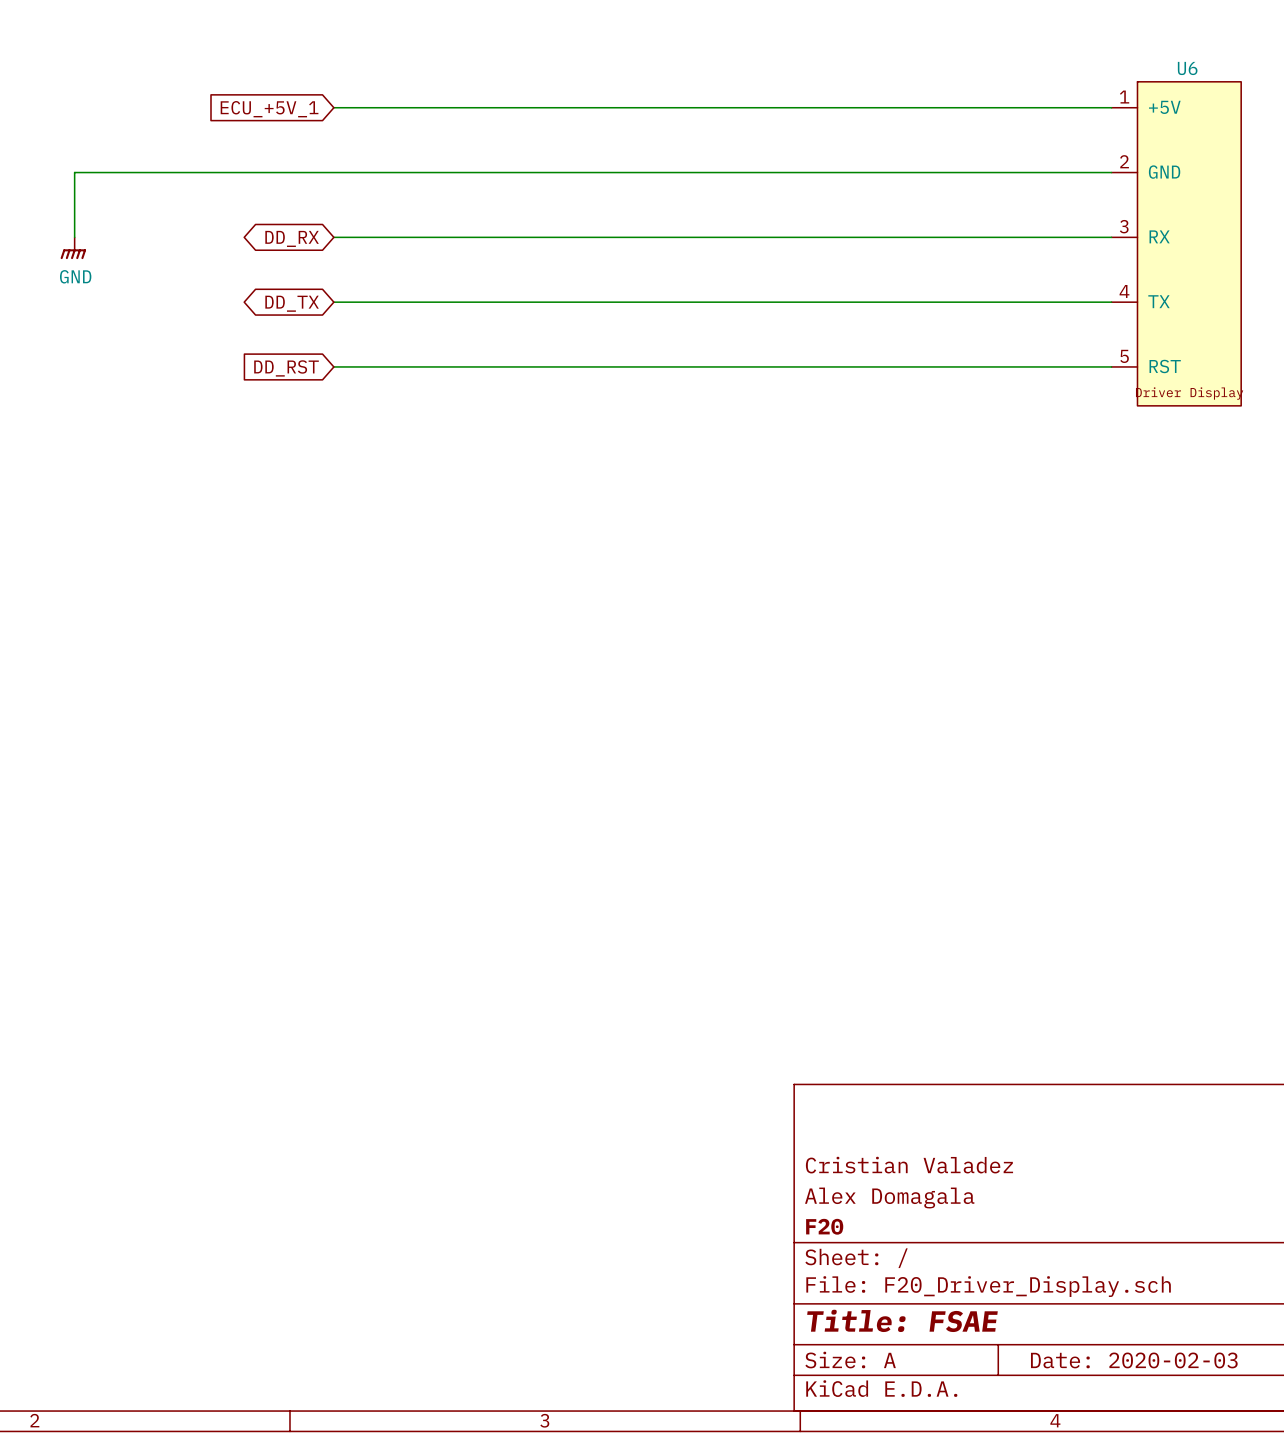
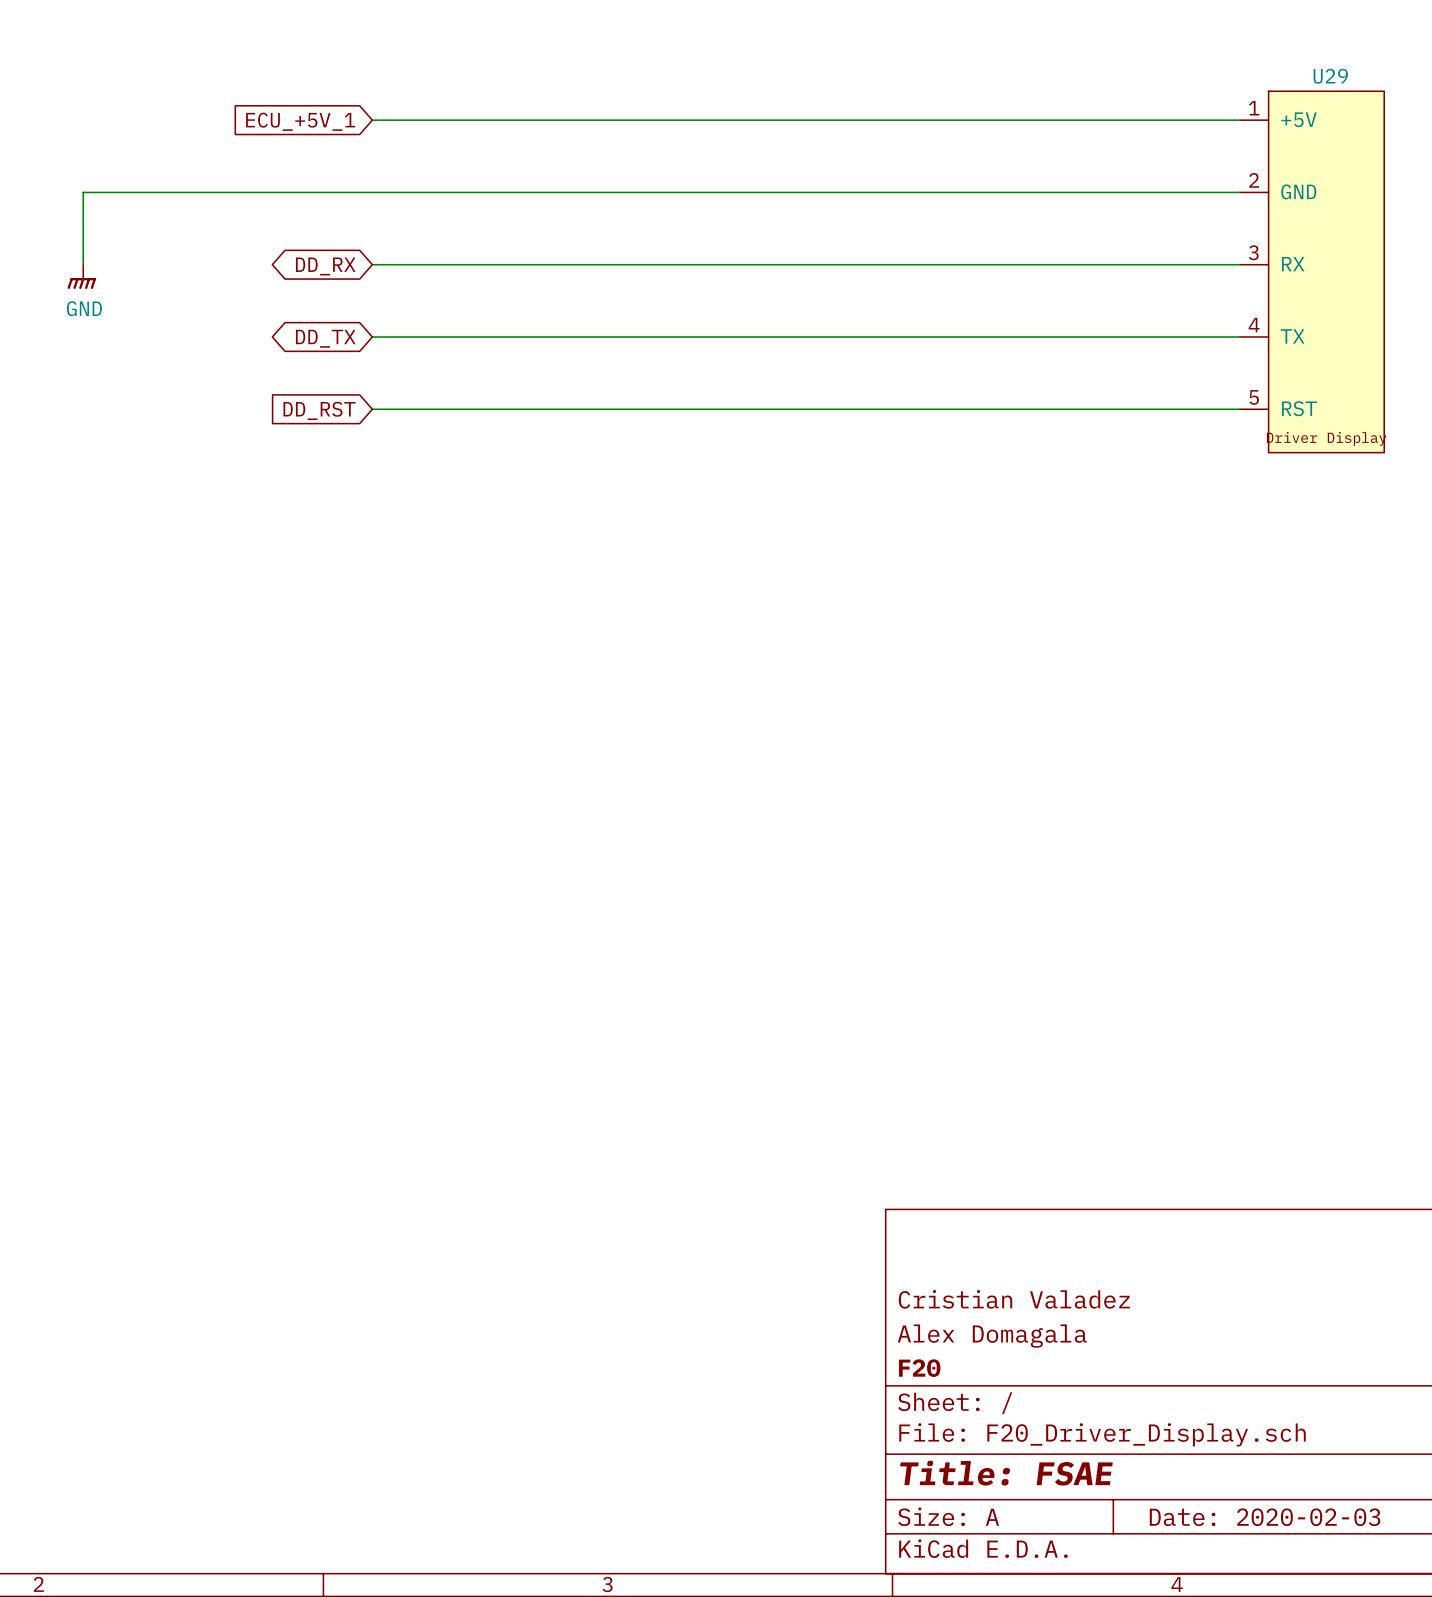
U6 name: U6 (1187, 68) -> U29 (1330, 76)

